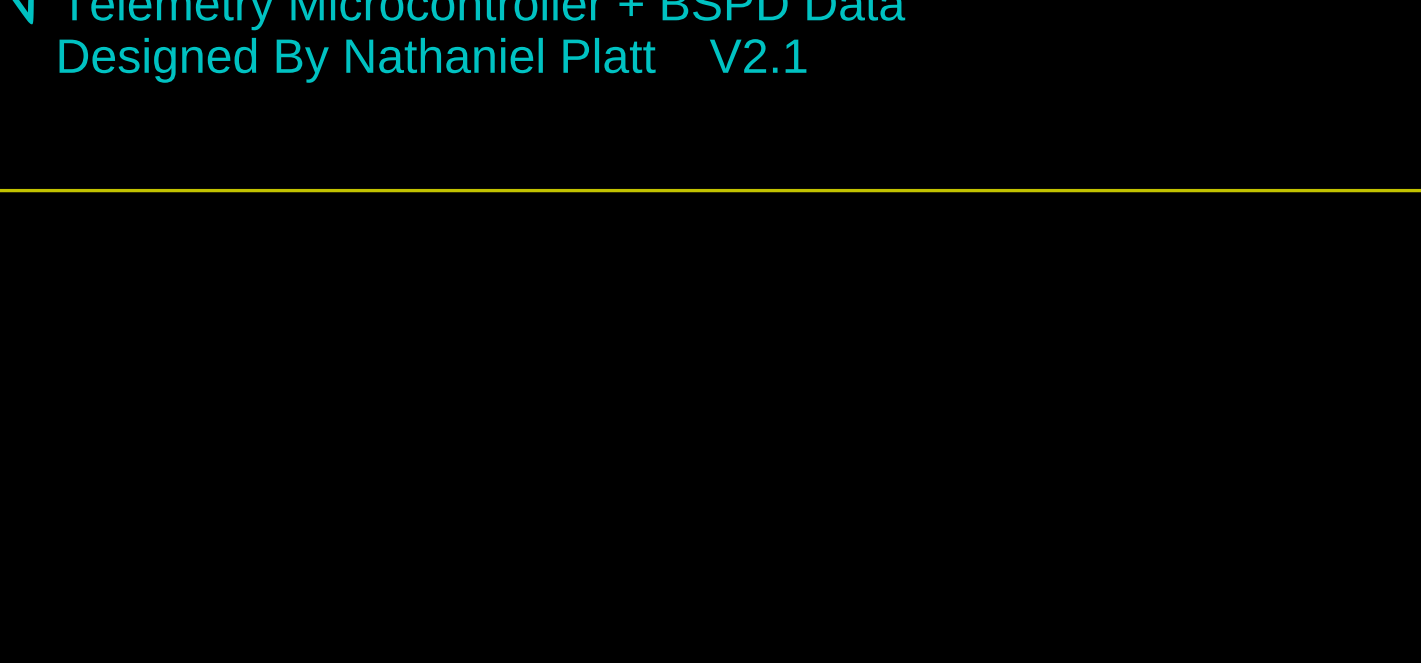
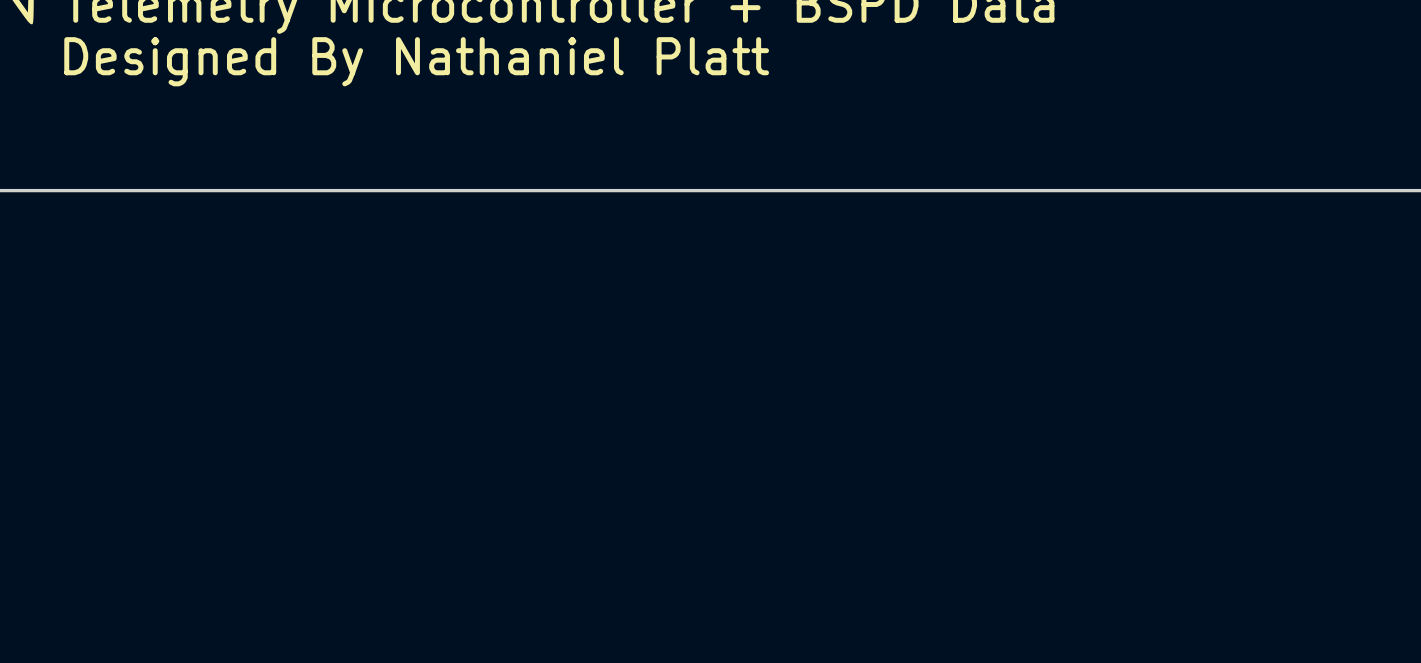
text: Designed By Nathaniel Platt V2.1 (432, 60) -> Designed By Nathaniel Platt (416, 61)

